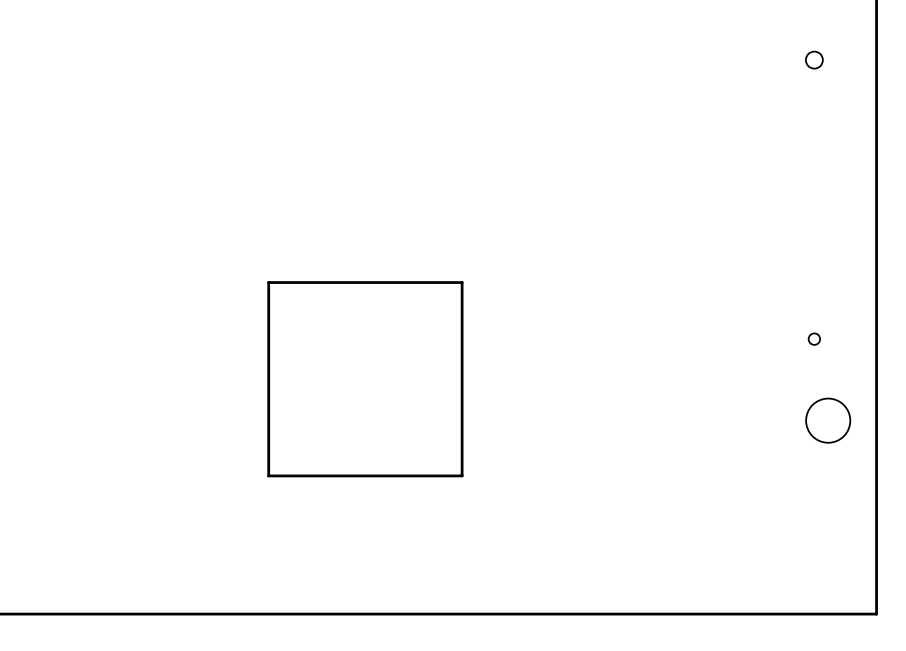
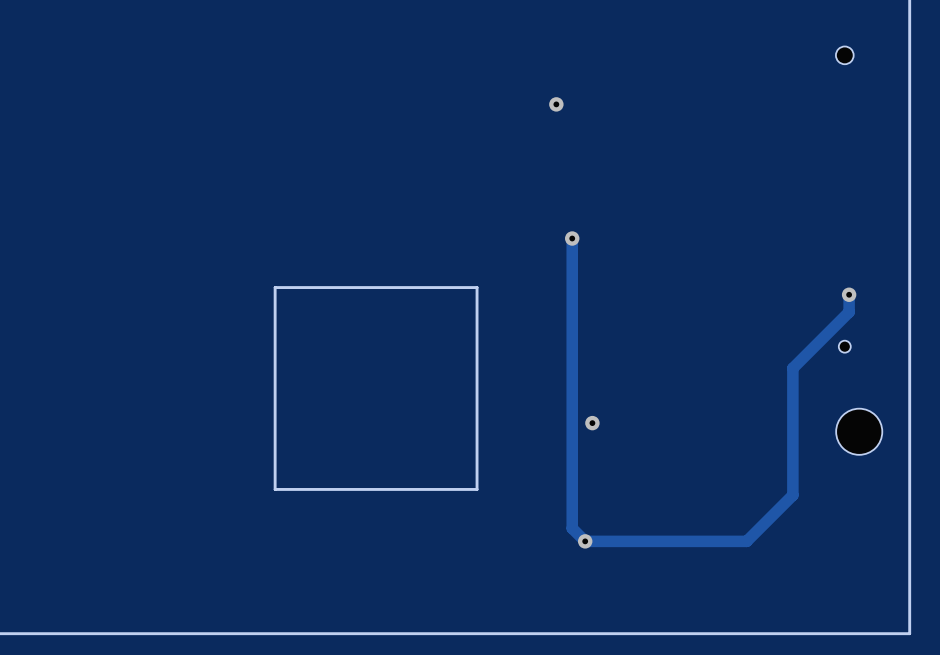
via: none -> (556, 104)
track: none -> (572, 238) (572, 528) (585, 541) (746, 541) (792, 495) (792, 368) (849, 312) (849, 294)
via: none -> (572, 238)
via: none -> (849, 294)
via: none -> (592, 423)
via: none -> (585, 541)

